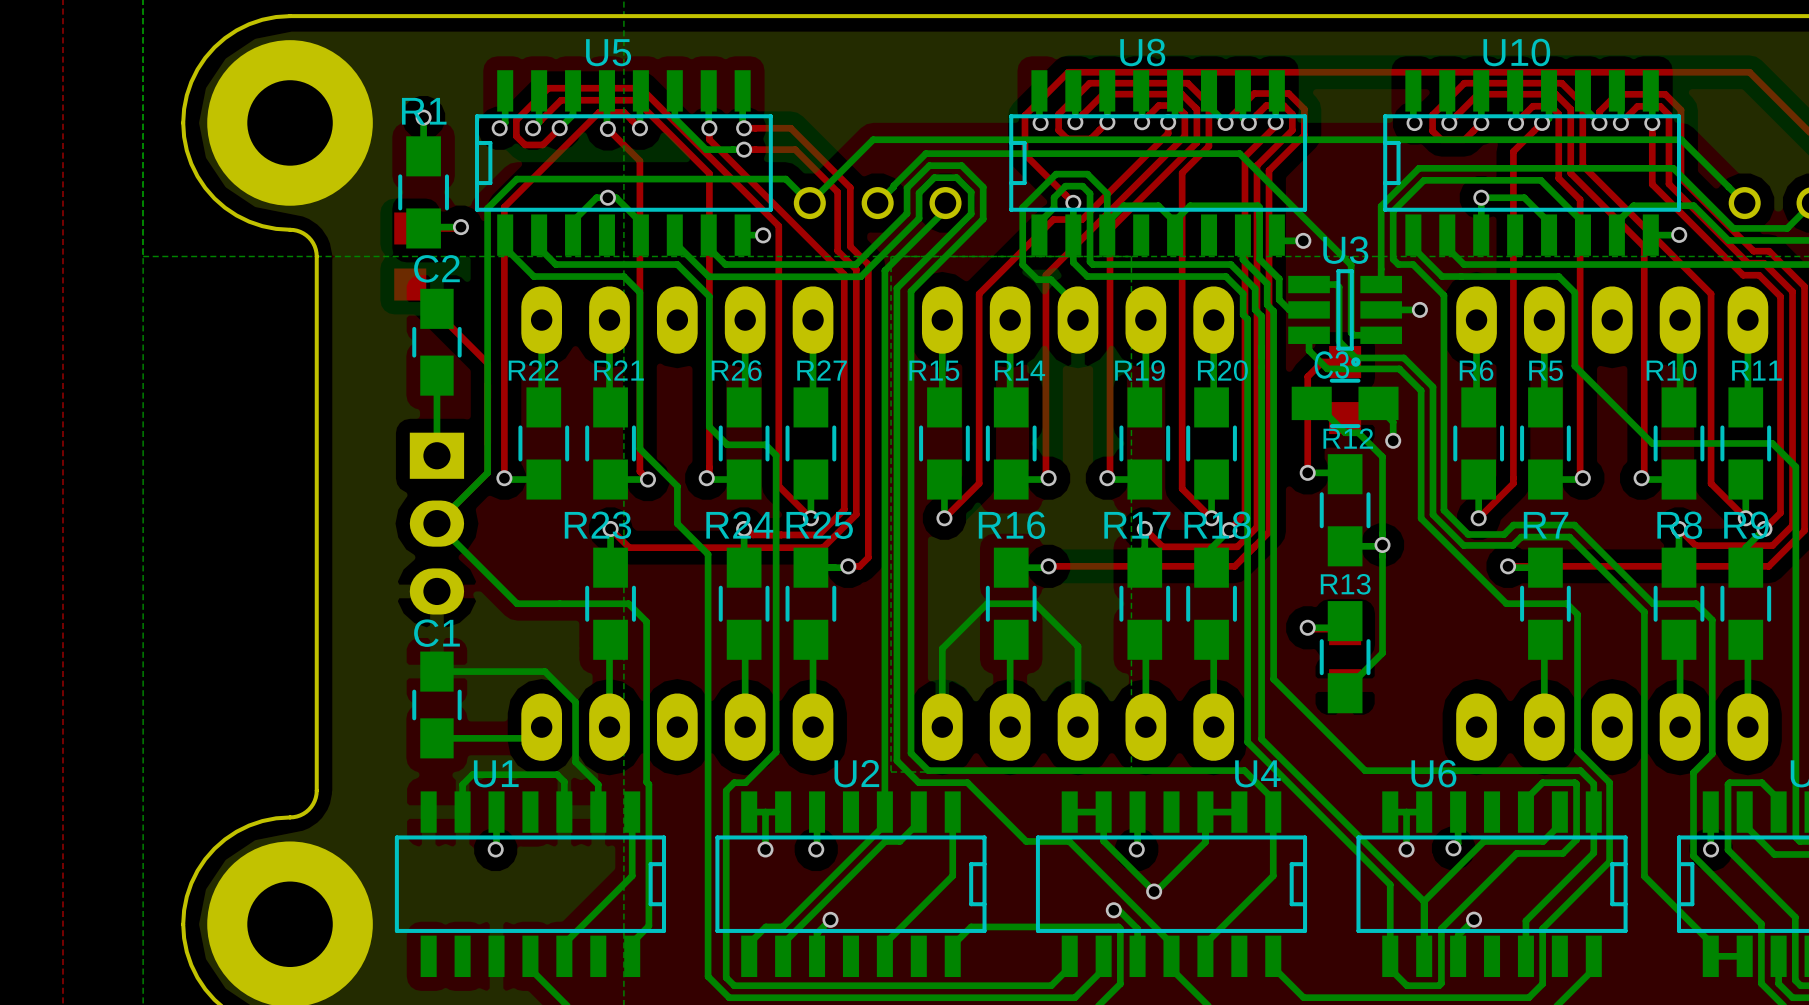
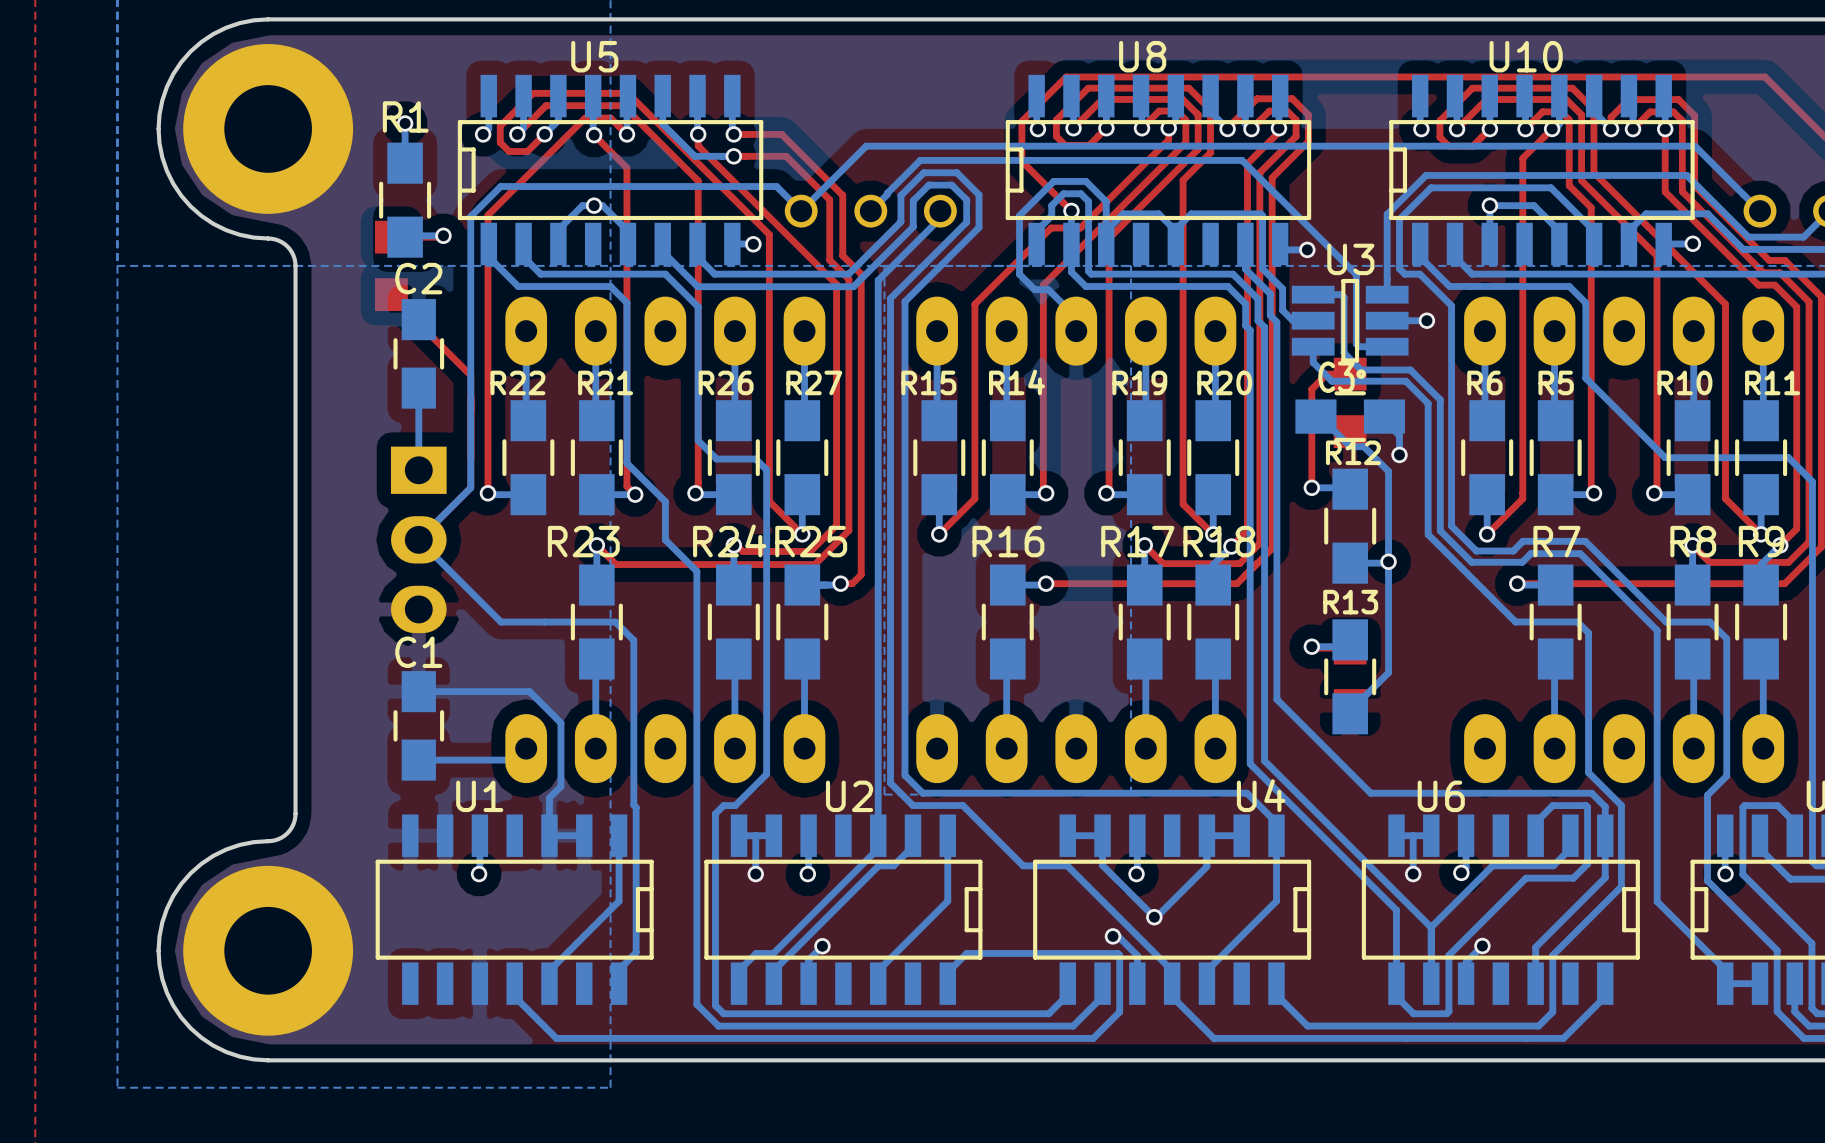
bottom track: (1078, 727) (1078, 646) (1035, 603) (987, 603) (942, 648) (942, 727) -> none
bottom track: (575, 761) (598, 784) (598, 812) -> (560, 784) (549, 797) (549, 804)
bottom track: (564, 781) (557, 774) (472, 774) (462, 784) (462, 812) -> none
bottom track: none -> (584, 835) (549, 835)

